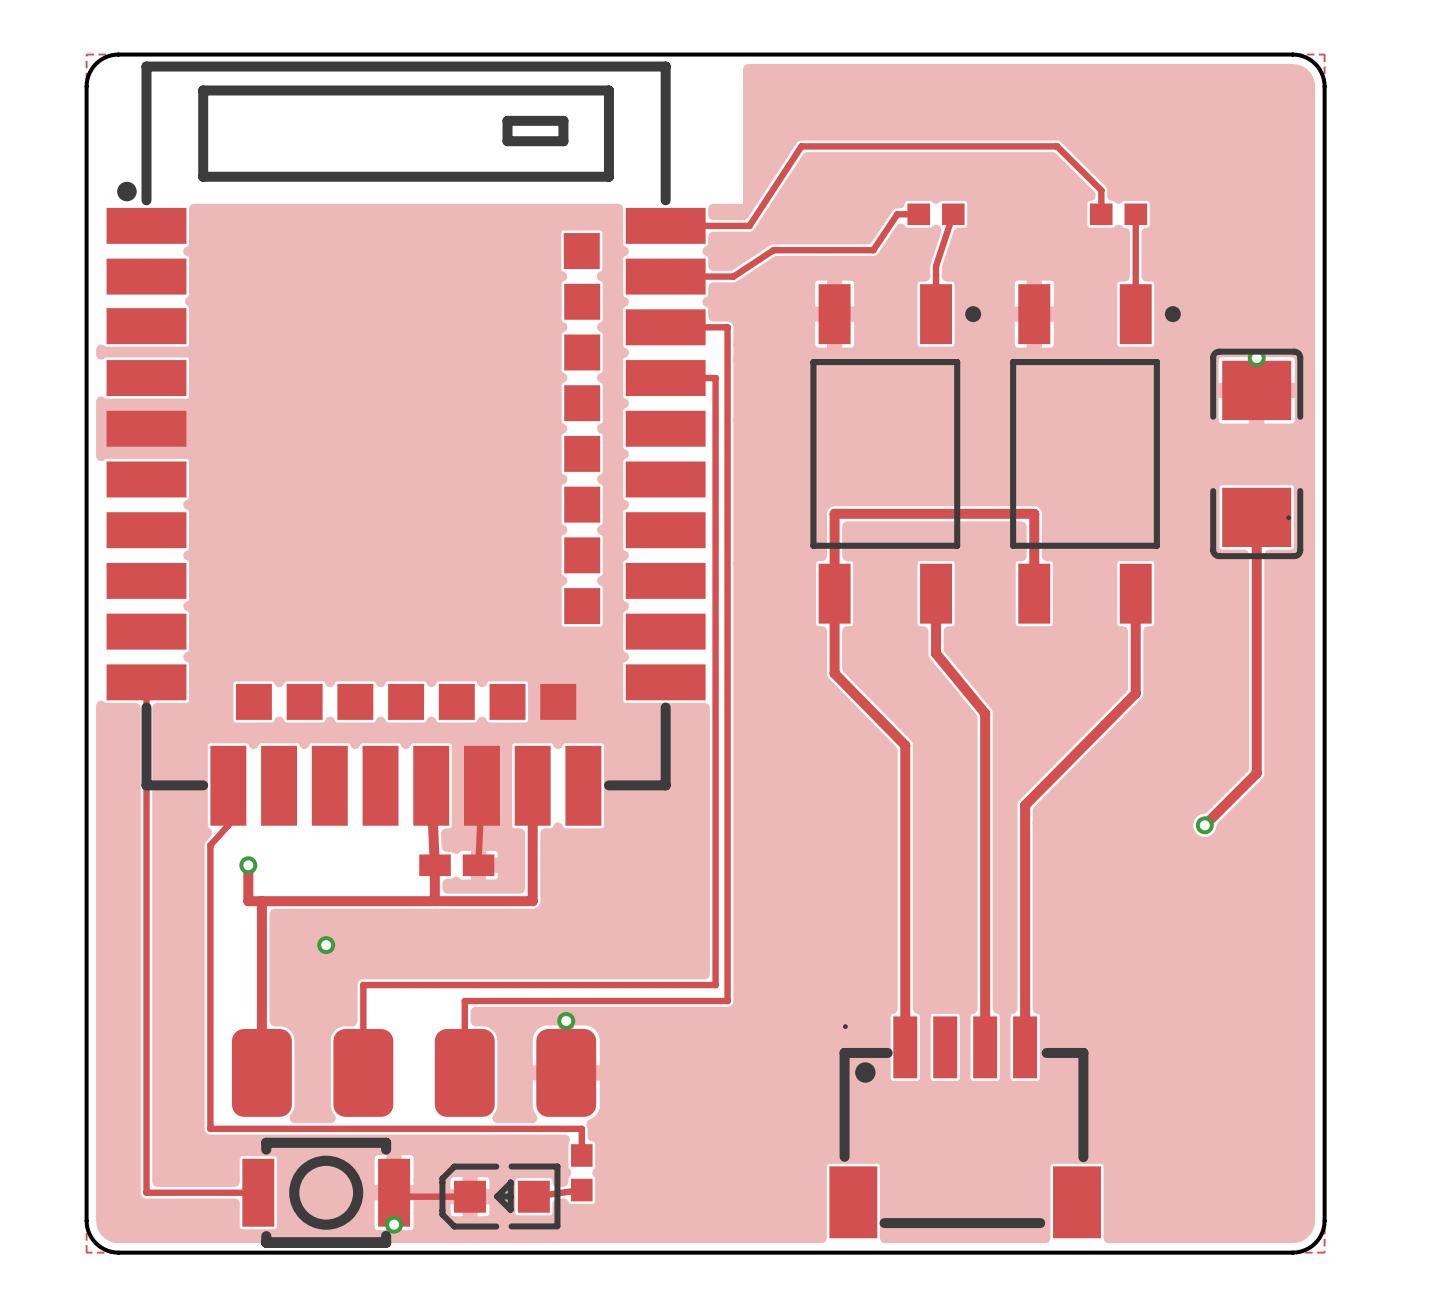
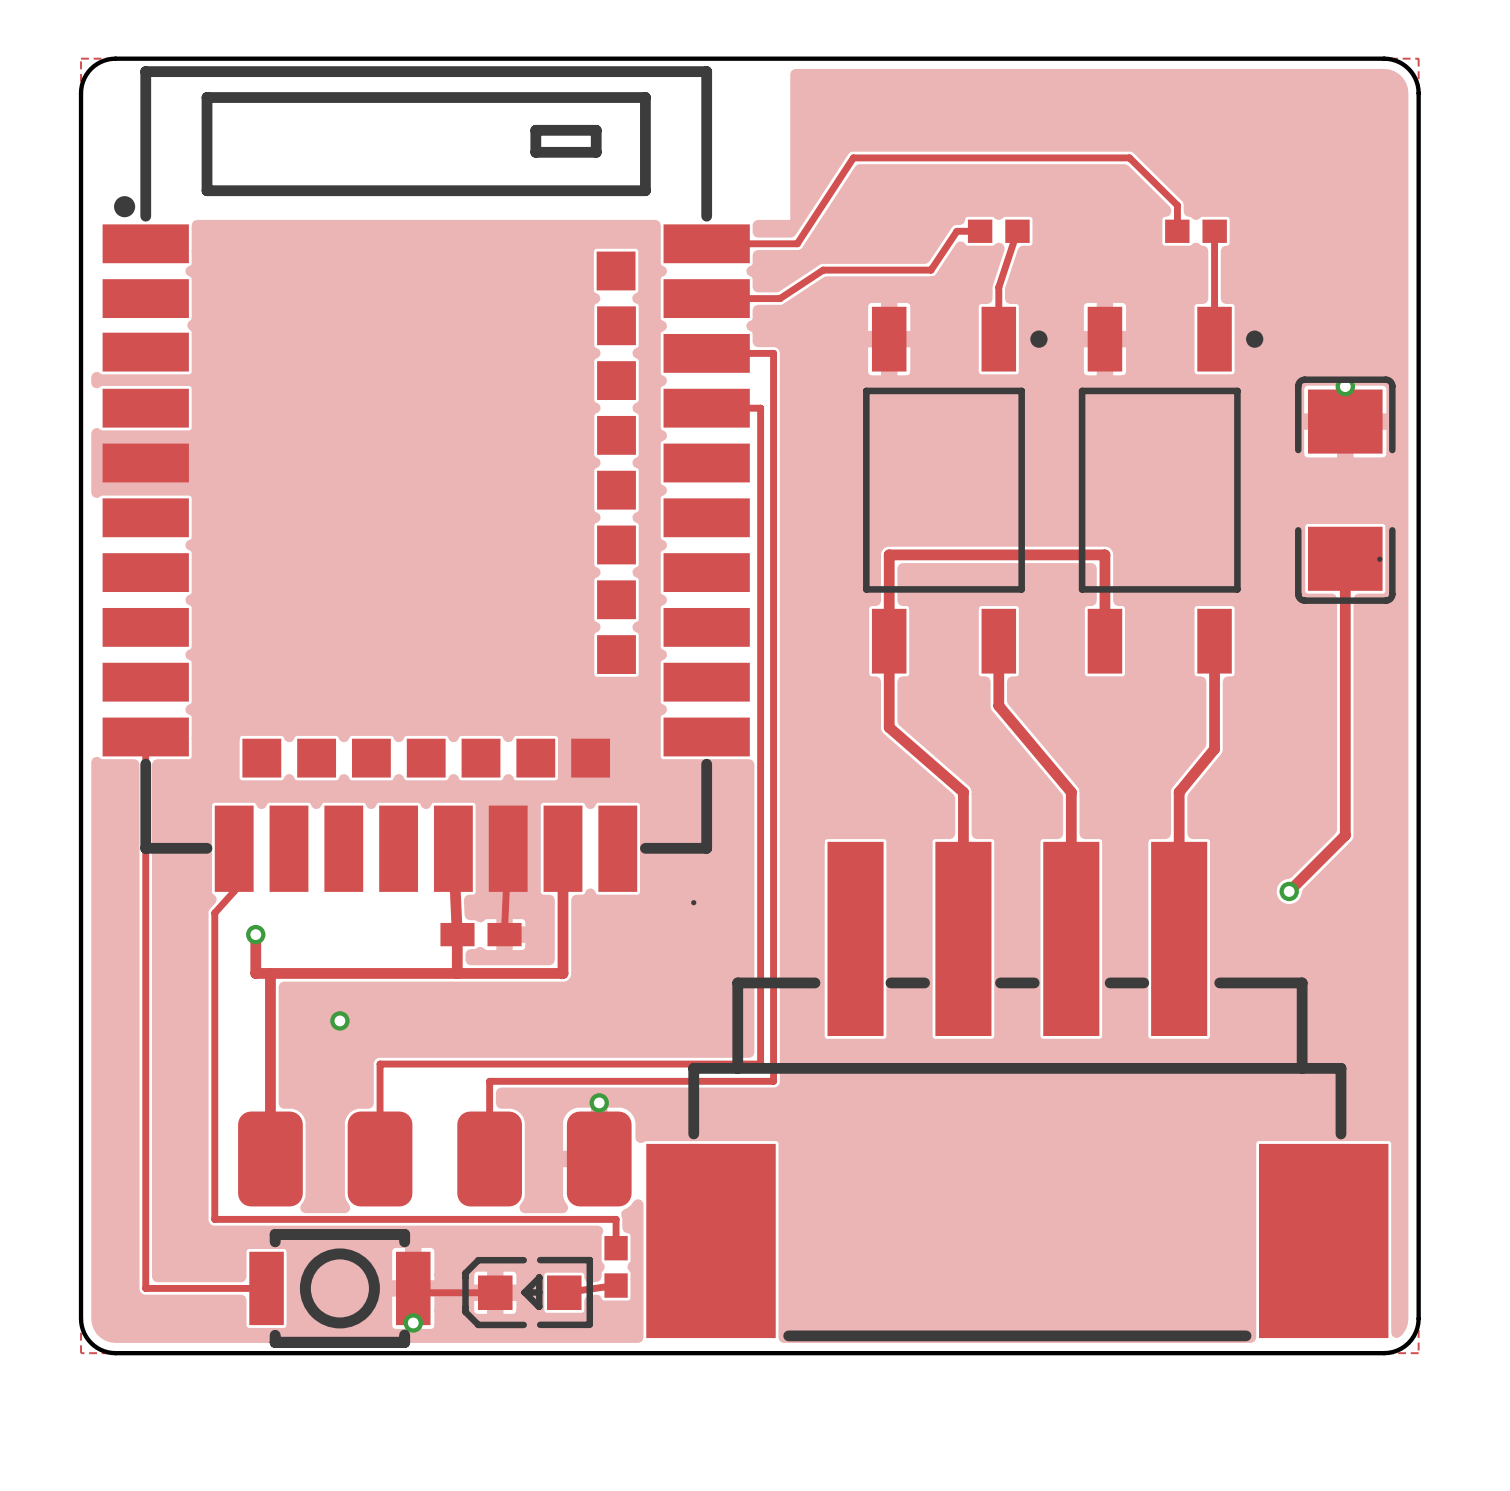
track: (936, 653) (985, 713) (985, 1017) -> (998, 705) (1071, 792) (1071, 844)
track: (834, 673) (905, 745) (905, 1017) -> (889, 727) (963, 792) (963, 844)
track: (1135, 693) (1025, 805) (1025, 1017) -> (1214, 749) (1179, 792) (1179, 844)
part: none -> (1017, 1091)
part: (965, 1127) -> none

